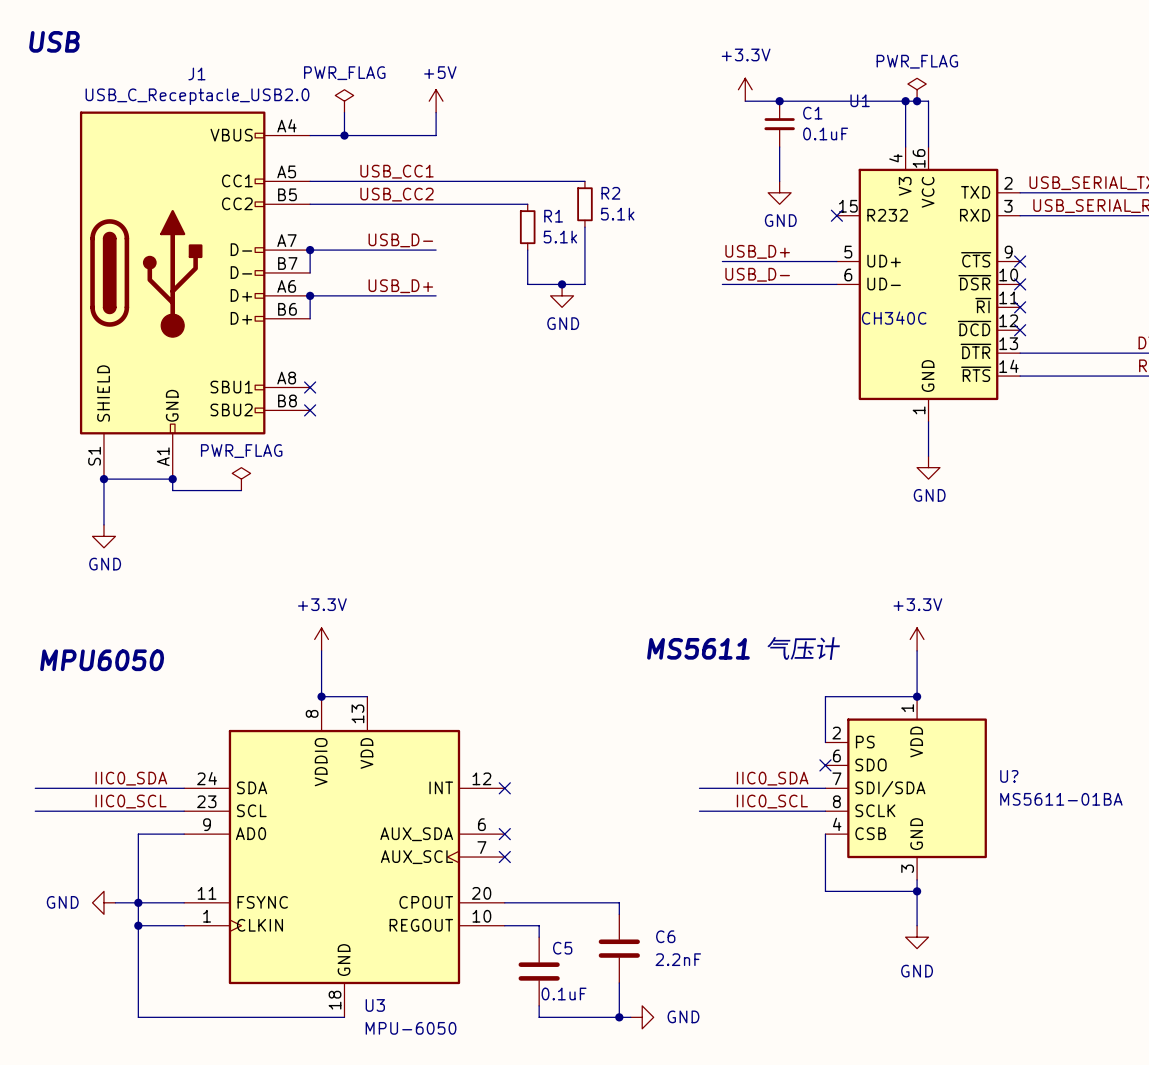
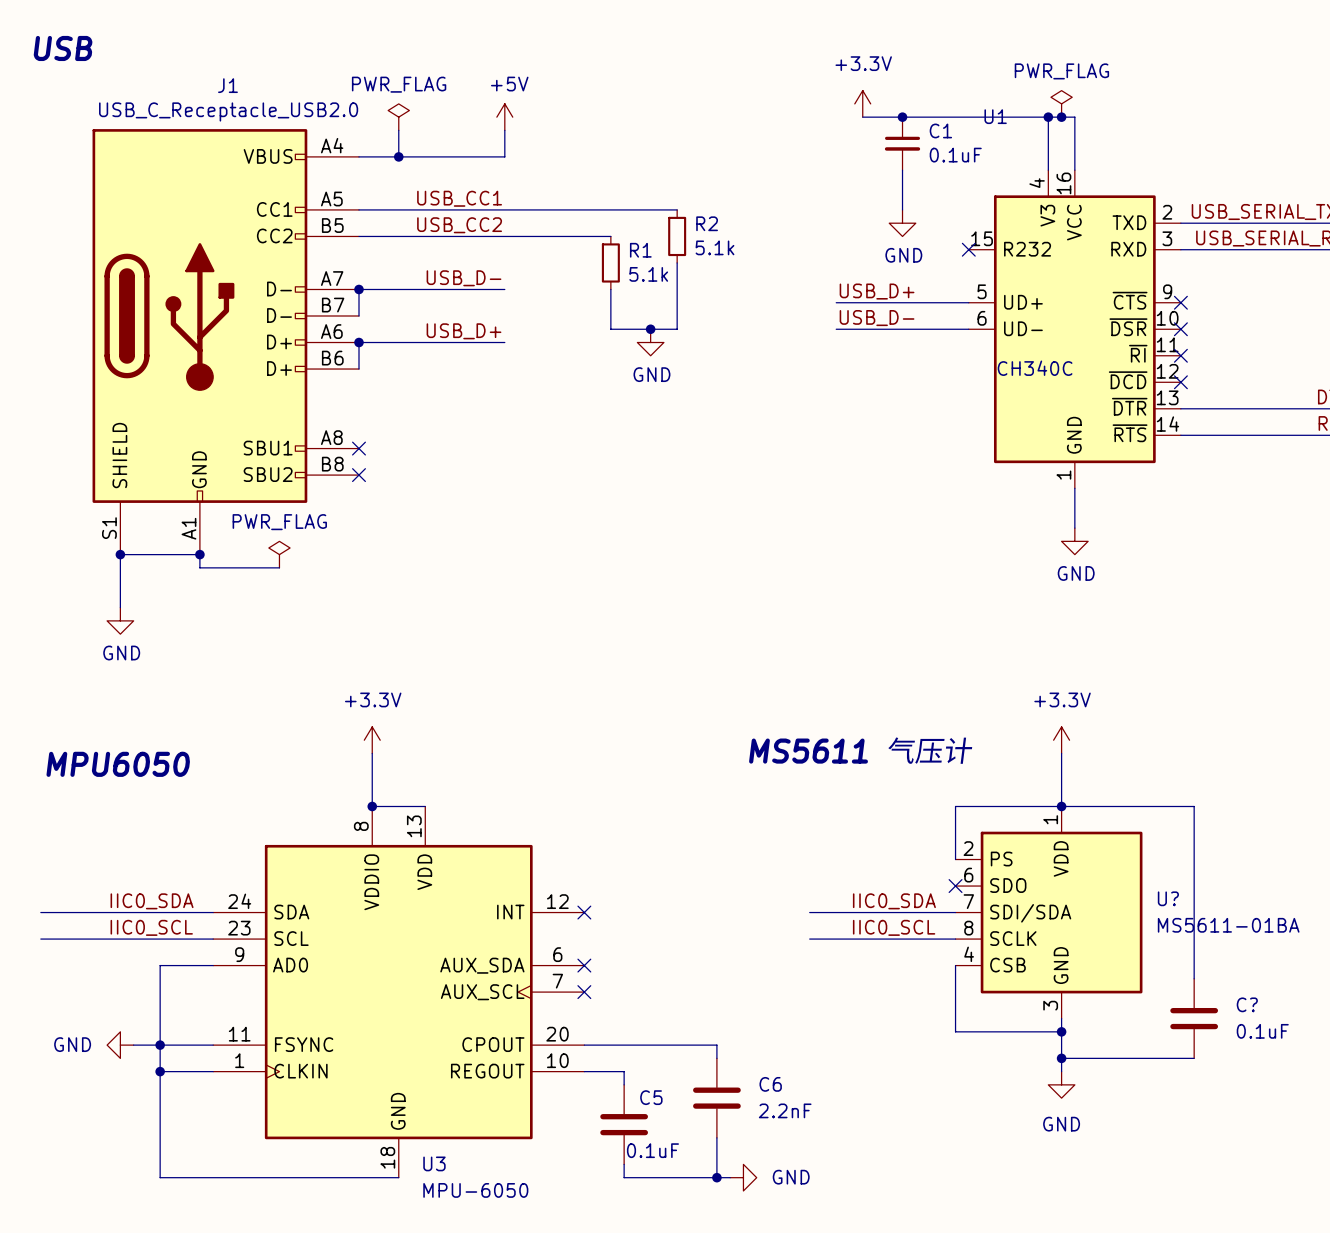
wire: none -> (1061, 806) (1194, 806) (1194, 978)
C?: none -> 0.1uF (1194, 1018)
wire: none -> (1061, 1058) (1194, 1058)
junction: none -> (1061, 1058)

